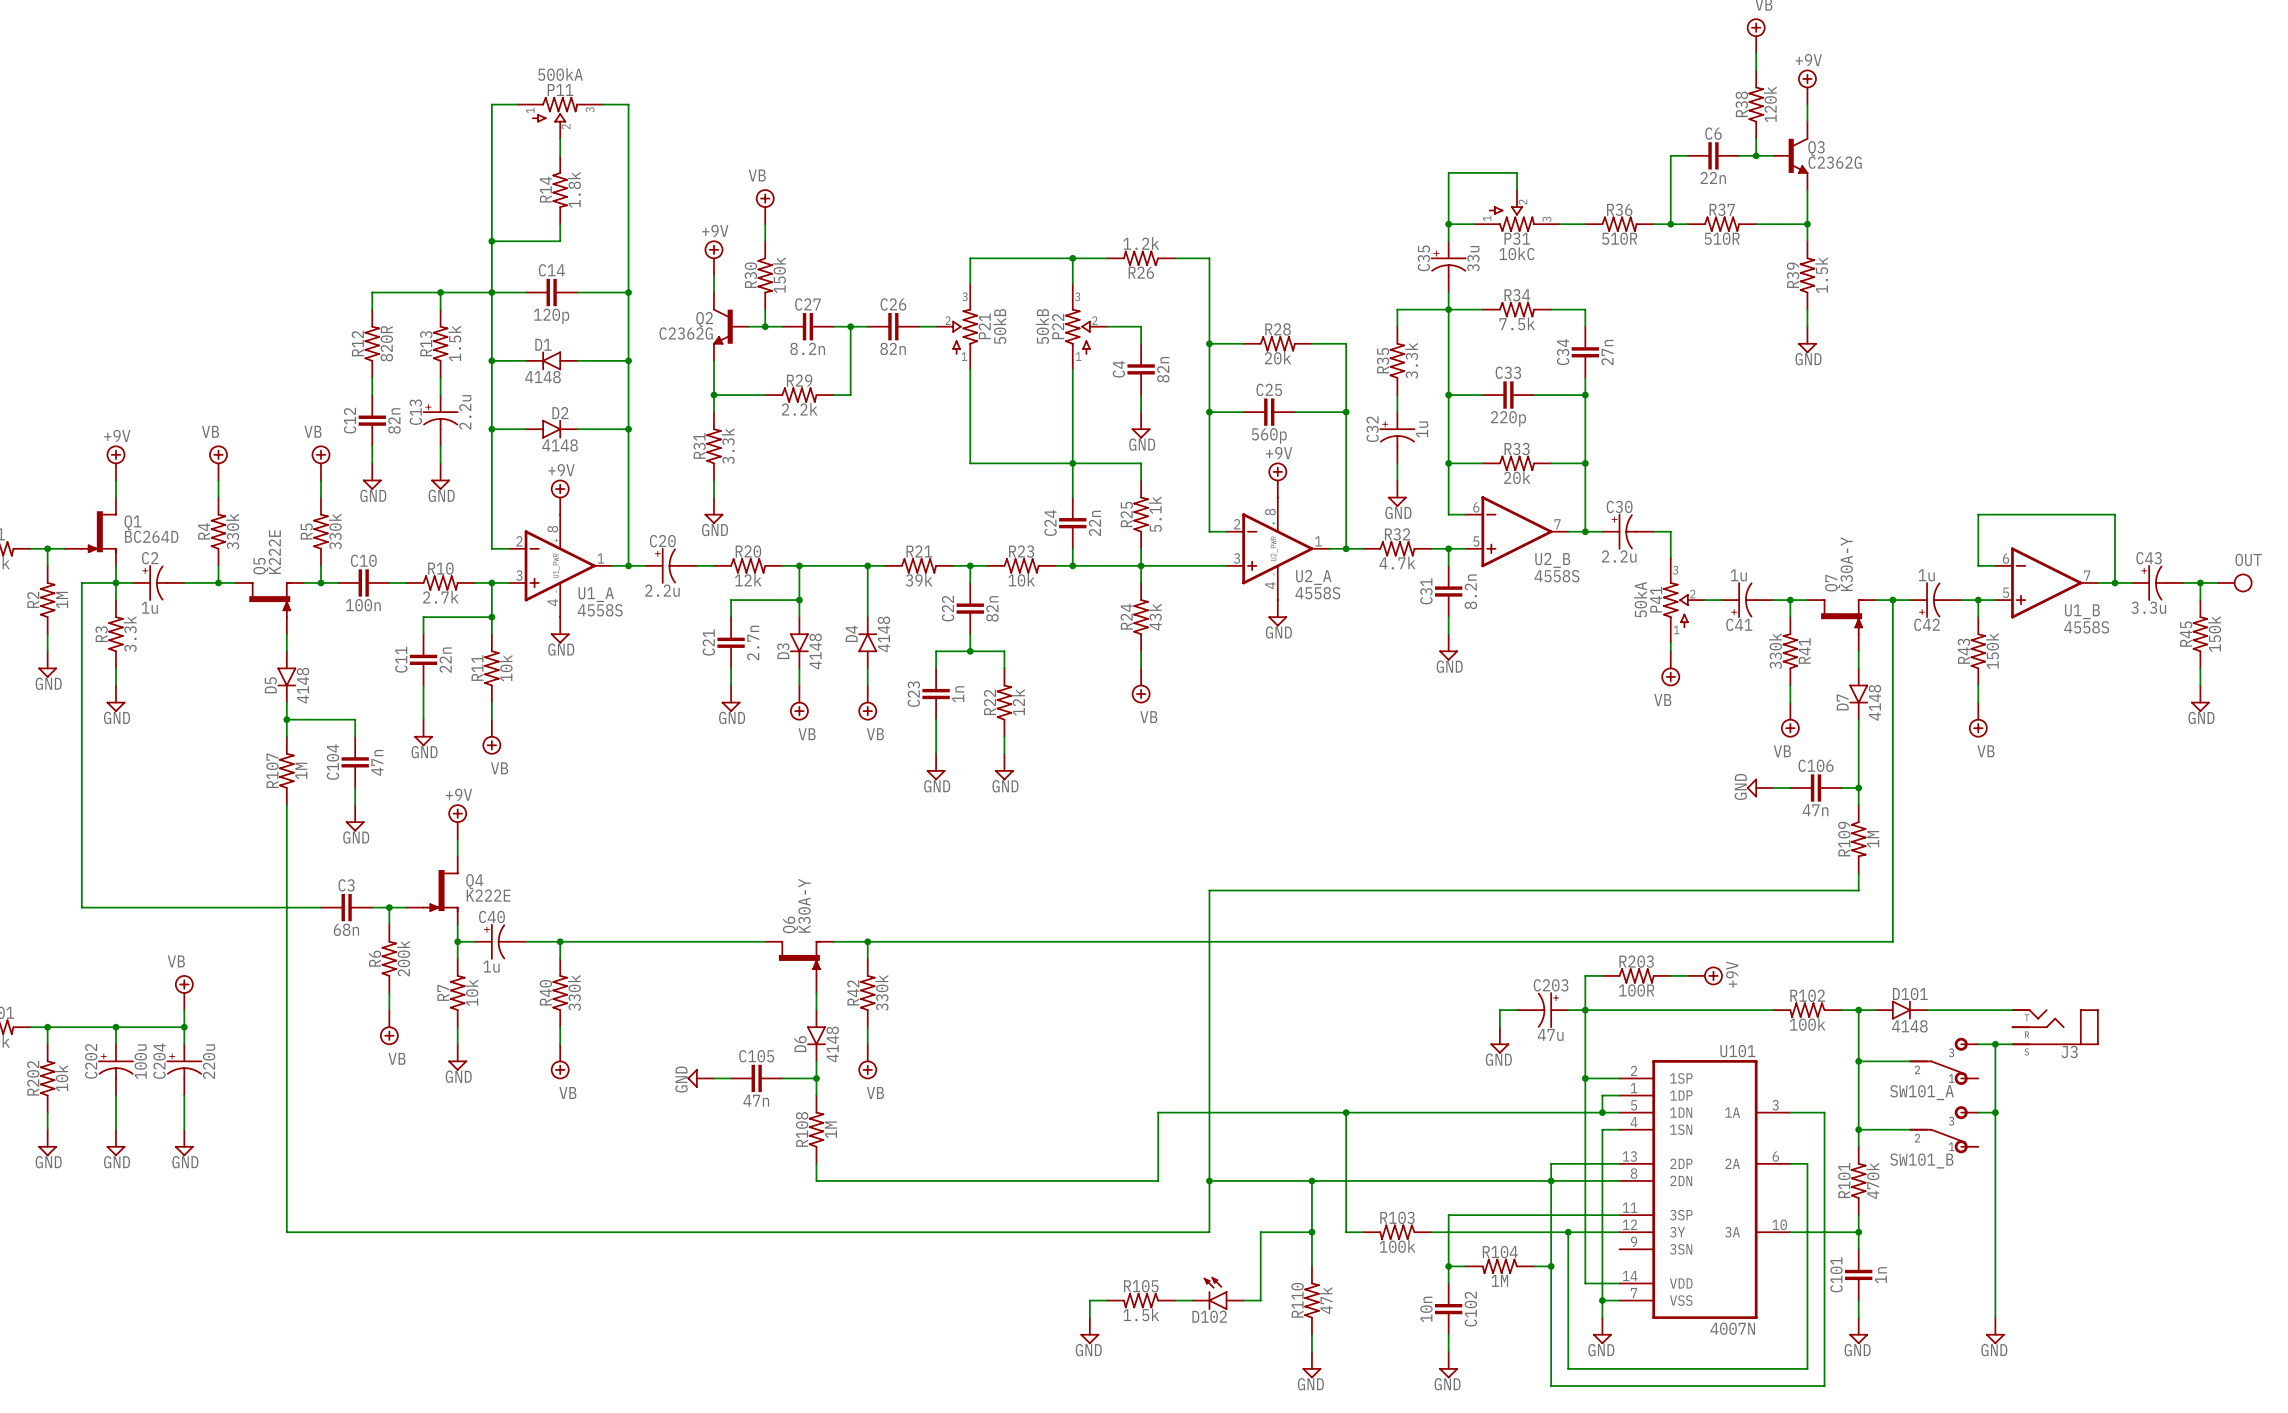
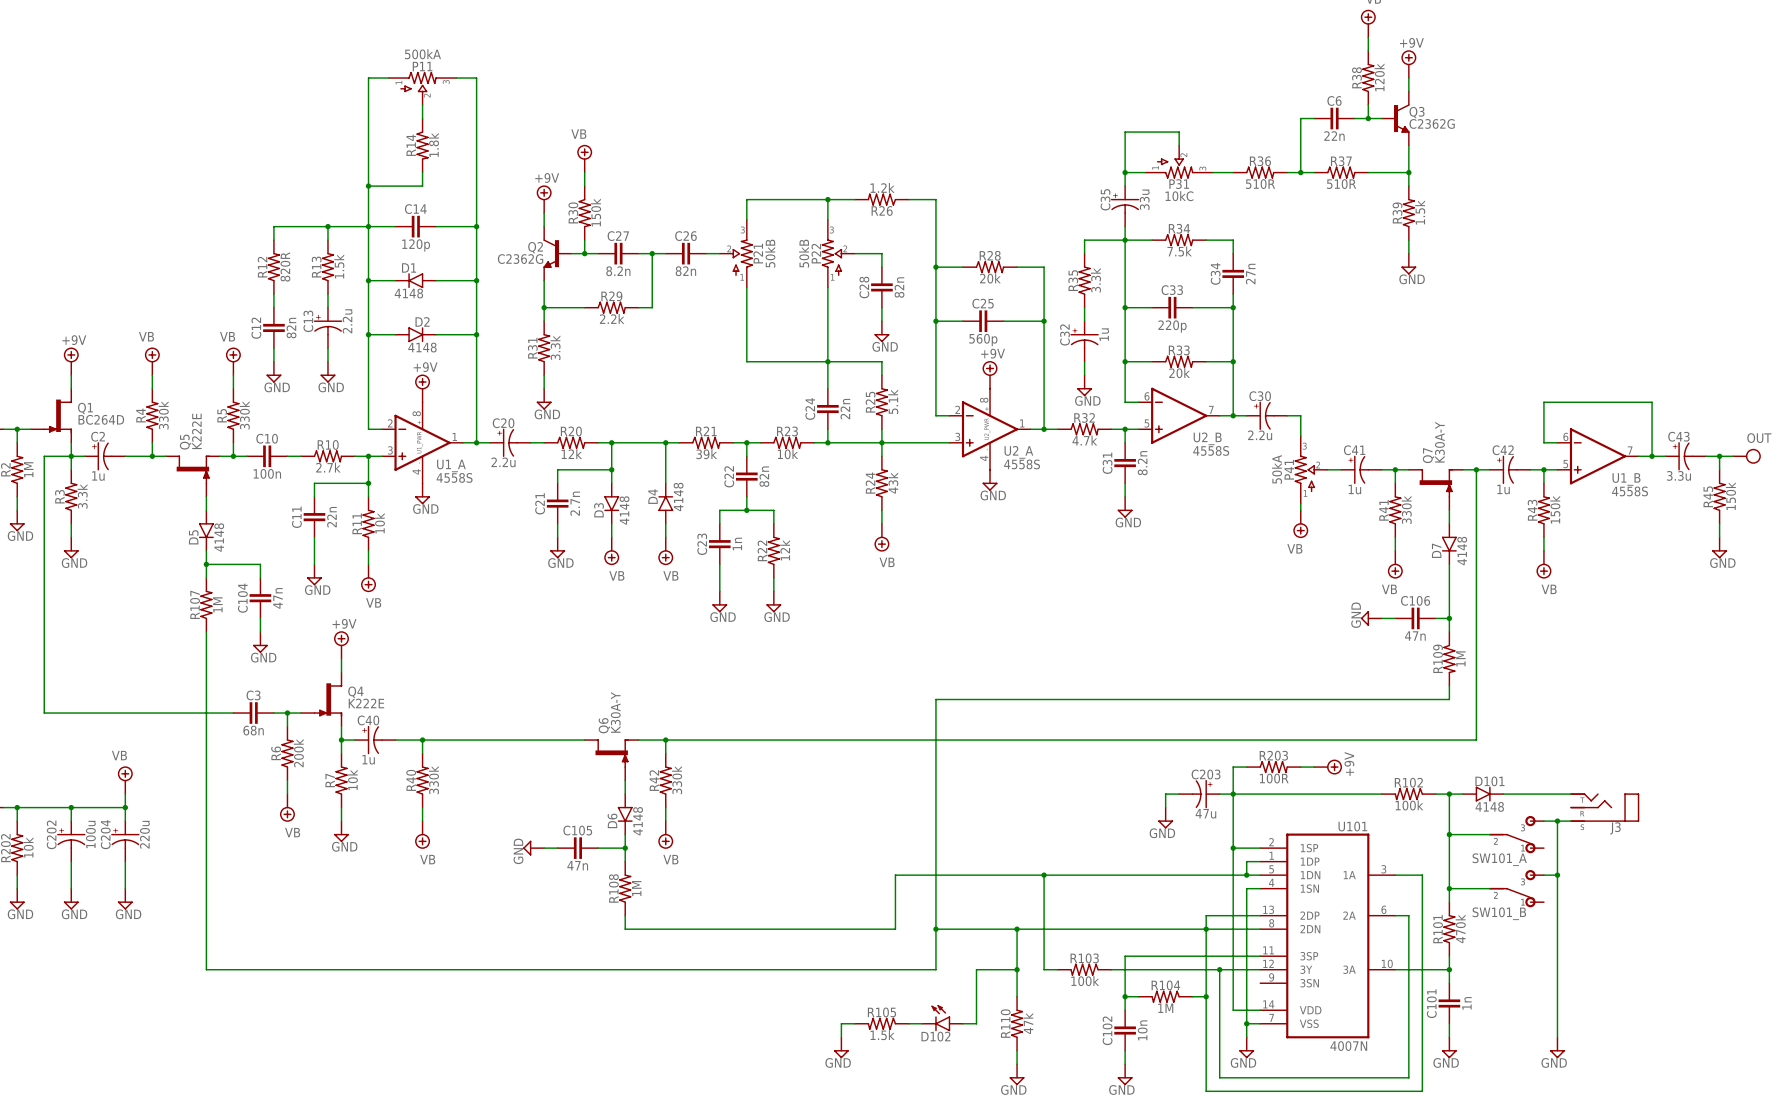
C4 name: C4 (1118, 369) -> C28 (864, 287)
C41 flip: as is (1743, 600) -> up-down (1358, 469)
C42 flip: as is (1931, 600) -> up-down (1507, 469)
R41 flip: as is (1790, 651) -> left-right (1395, 510)
C102 value position: 10n (1426, 1309) -> 10n (1142, 1030)
C102 name position: C102 (1470, 1309) -> C102 (1107, 1030)

